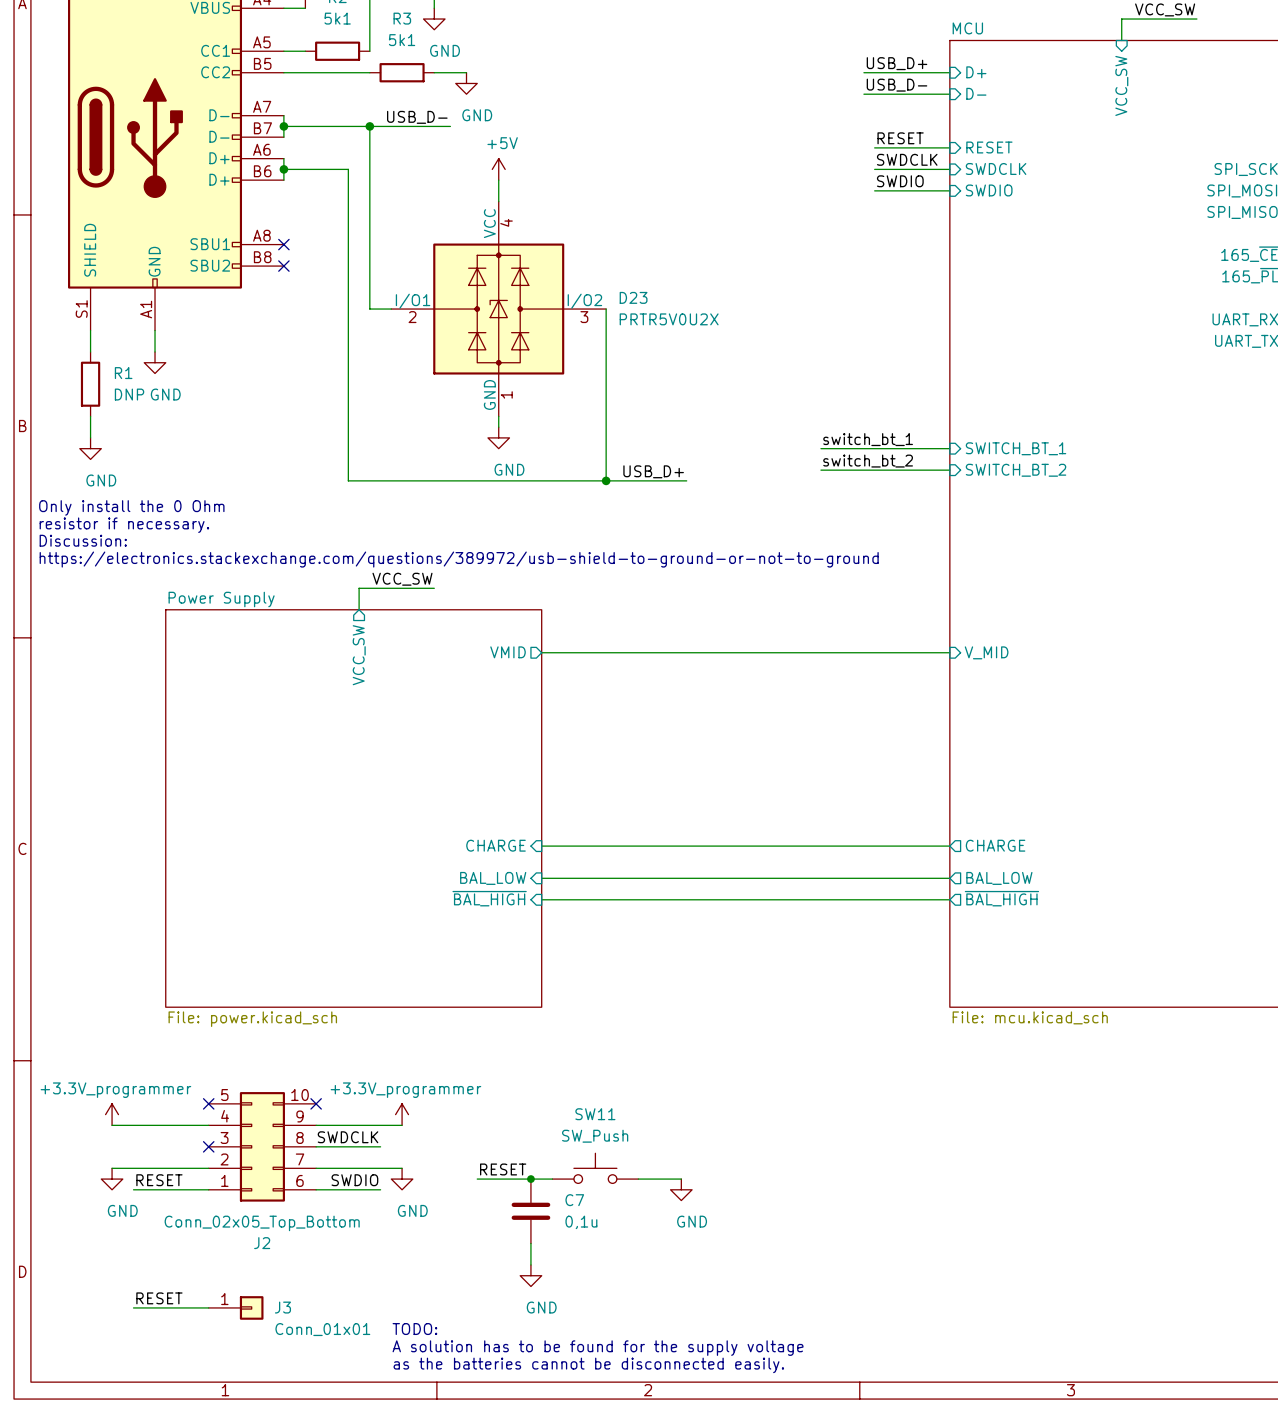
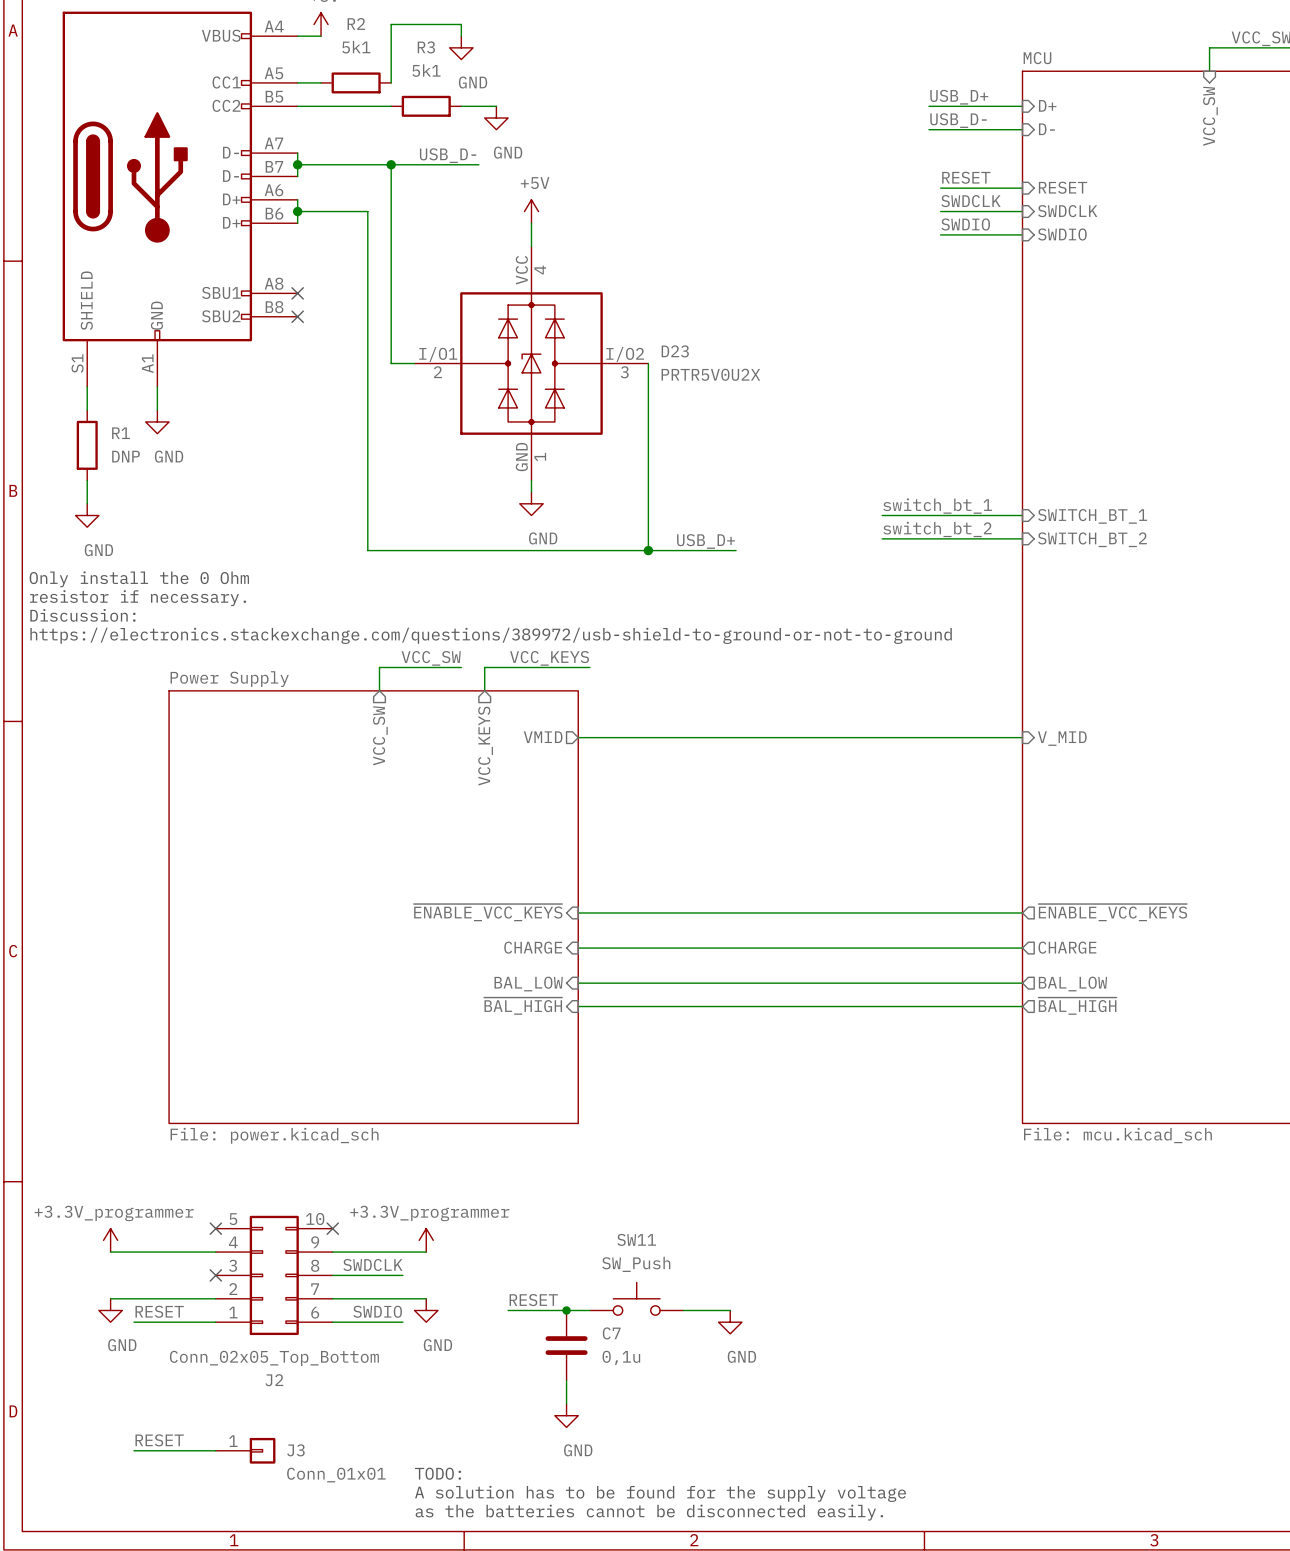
label: none -> VCC_KEYS (549, 658)
wire: none -> (589, 667) (484, 667) (484, 690)
sheet pin: none -> VCC_KEYS (485, 746)
sheet pin: none -> ~{ENABLE_VCC_KEYS} (488, 912)
sheet pin: none -> ~{ENABLE_VCC_KEYS} (1112, 912)
wire: none -> (578, 913) (1022, 913)

